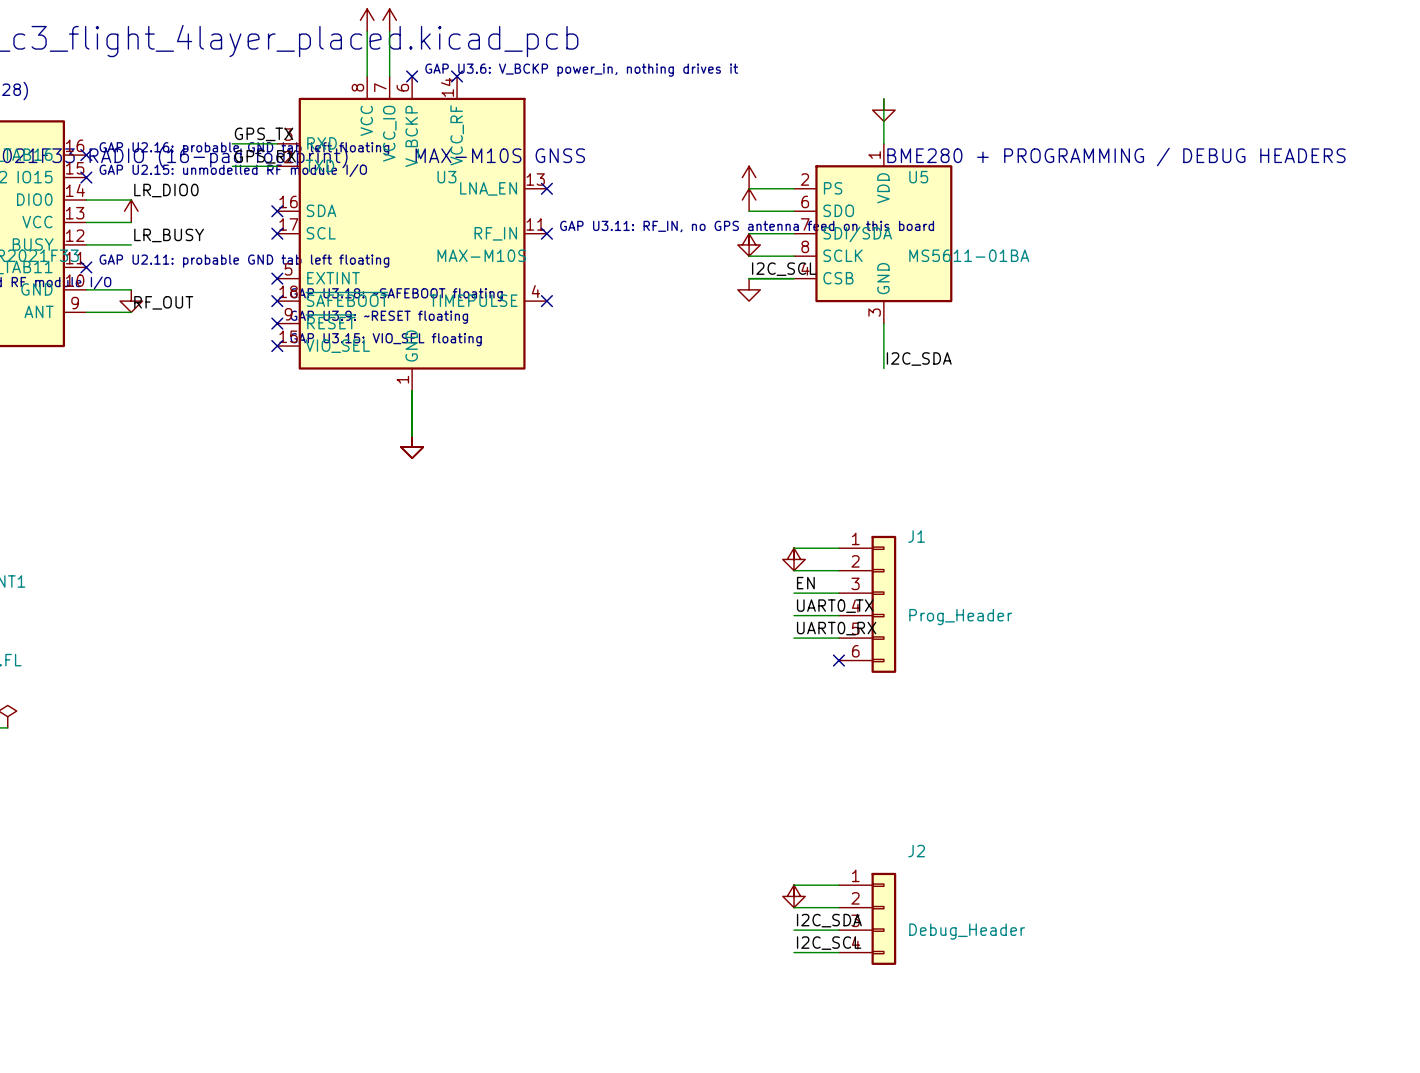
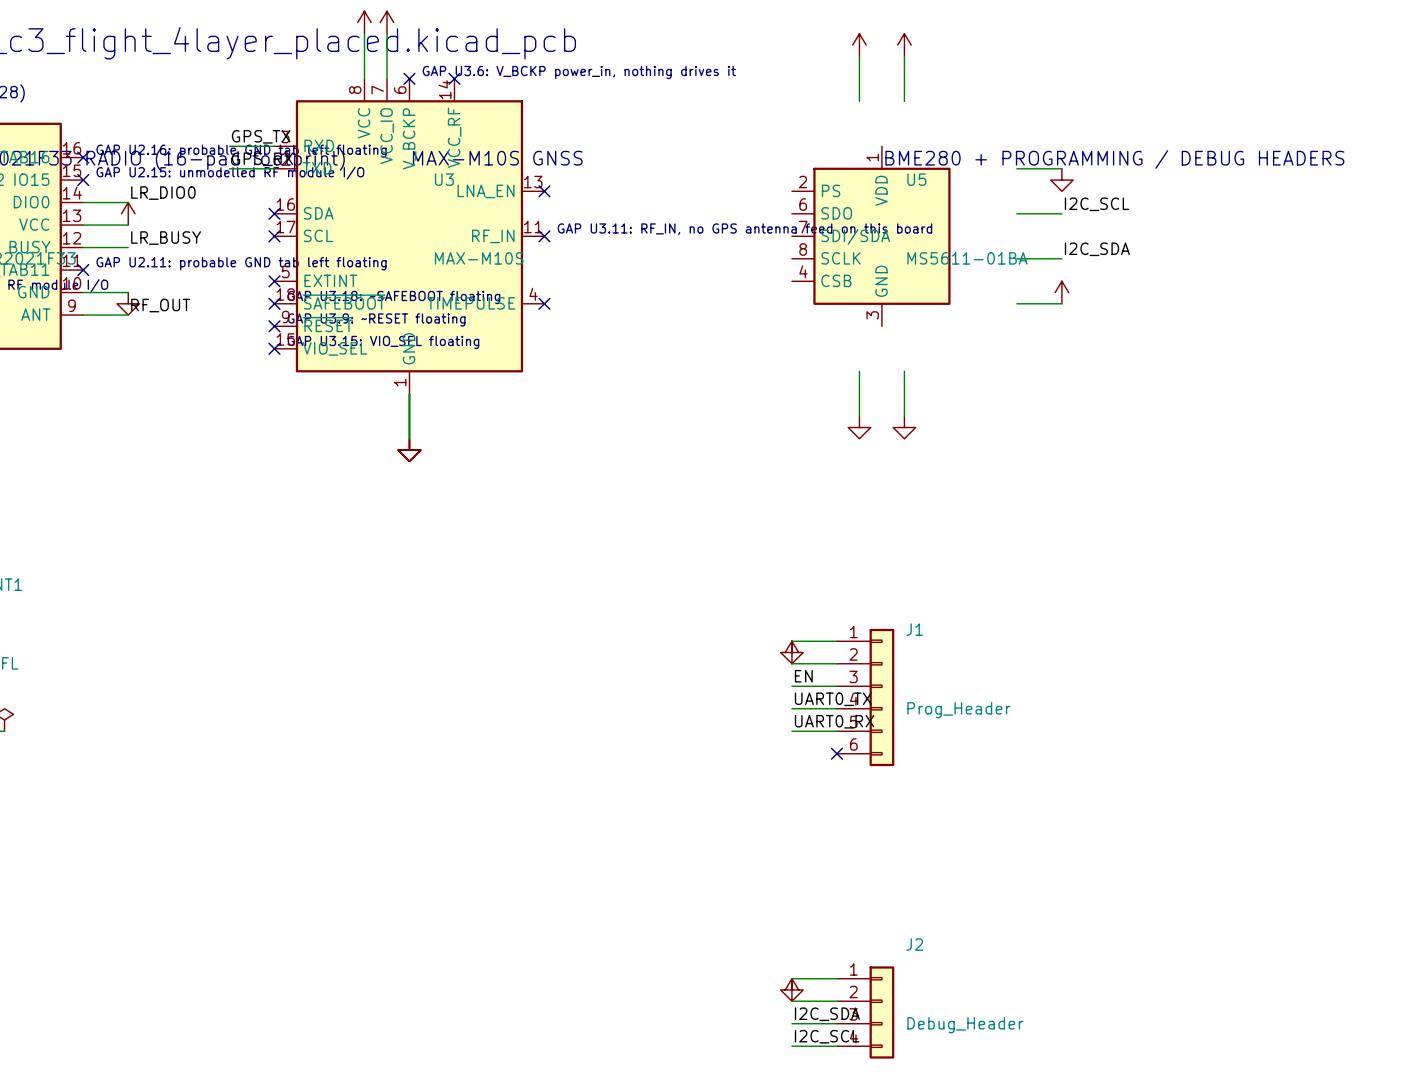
power symbol: none -> (859, 45)
power symbol: none -> (904, 45)
wire: none -> (904, 56) (904, 101)
wire: (883, 98) (883, 143) -> (859, 56) (859, 101)
power symbol: (883, 110) -> none
wire: none -> (1016, 168) (1061, 168)
power symbol: (749, 177) -> none
power symbol: none -> (1061, 180)
wire: (749, 188) (794, 188) -> none
power symbol: (749, 200) -> none
label: none -> I2C_SCL (1097, 204)
wire: (749, 211) (794, 211) -> none
wire: none -> (1016, 213) (1061, 213)
wire: (749, 233) (794, 233) -> none
power symbol: (749, 244) -> none
power symbol: (749, 244) -> none
wire: (749, 256) (794, 256) -> none
wire: none -> (1016, 258) (1061, 258)
label: I2C_SCL (784, 269) -> none
wire: (749, 278) (794, 278) -> none
power symbol: (749, 289) -> none
power symbol: none -> (1061, 292)
wire: none -> (1016, 303) (1061, 303)
wire: (883, 323) (883, 368) -> (859, 371) (859, 416)
label position: I2C_SDA (919, 359) -> I2C_SDA (1097, 249)
wire: none -> (904, 371) (904, 416)
power symbol: none -> (859, 427)
power symbol: none -> (904, 427)
wire: (794, 548) (838, 548) -> (791, 731) (836, 731)
power symbol position: (794, 559) -> (791, 652)
power symbol: (794, 559) -> none
wire: (794, 570) (838, 570) -> (791, 663) (836, 663)
label position: EN (805, 583) -> EN (803, 676)
wire: (794, 593) (838, 593) -> (791, 686) (836, 686)
J1 position: (867, 604) -> (865, 697)
label position: UART0_TX (835, 606) -> UART0_TX (833, 699)
wire: (794, 615) (838, 615) -> (791, 708) (836, 708)
label position: UART0_RX (836, 628) -> UART0_RX (834, 721)
power symbol: none -> (791, 652)
no-connect mark: (838, 660) -> none
no-connect mark: none -> (836, 753)
wire: (794, 885) (838, 885) -> (791, 978) (836, 978)
power symbol position: (794, 896) -> (791, 989)
power symbol position: (794, 896) -> (791, 989)
wire: (794, 907) (838, 907) -> (791, 1001) (836, 1001)
J2 position: (867, 918) -> (865, 1012)
label position: I2C_SDA (829, 920) -> I2C_SDA (827, 1014)
wire: (794, 930) (838, 930) -> (791, 1023) (836, 1023)
label position: I2C_SCL (829, 943) -> I2C_SCL (827, 1036)
wire: (794, 952) (838, 952) -> (791, 1046) (836, 1046)

